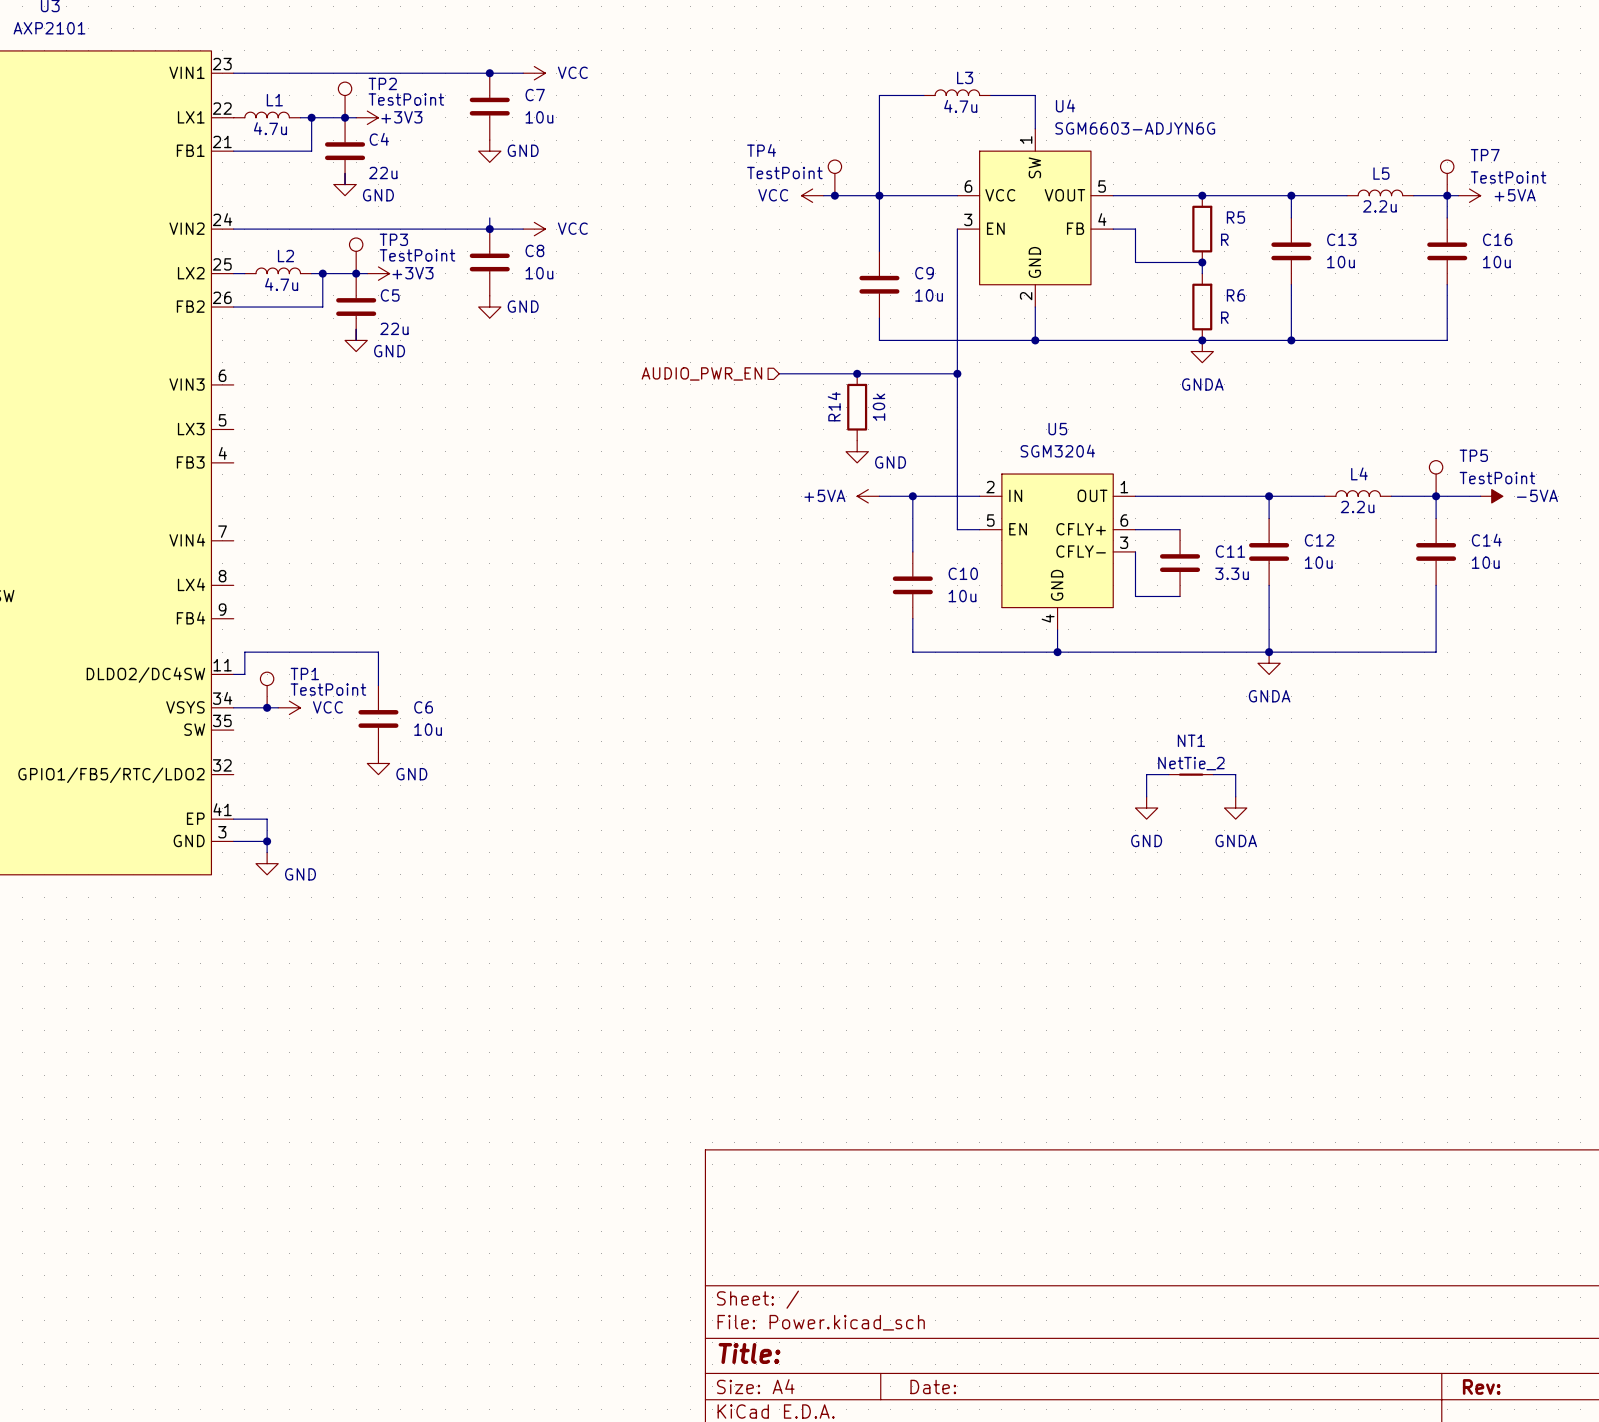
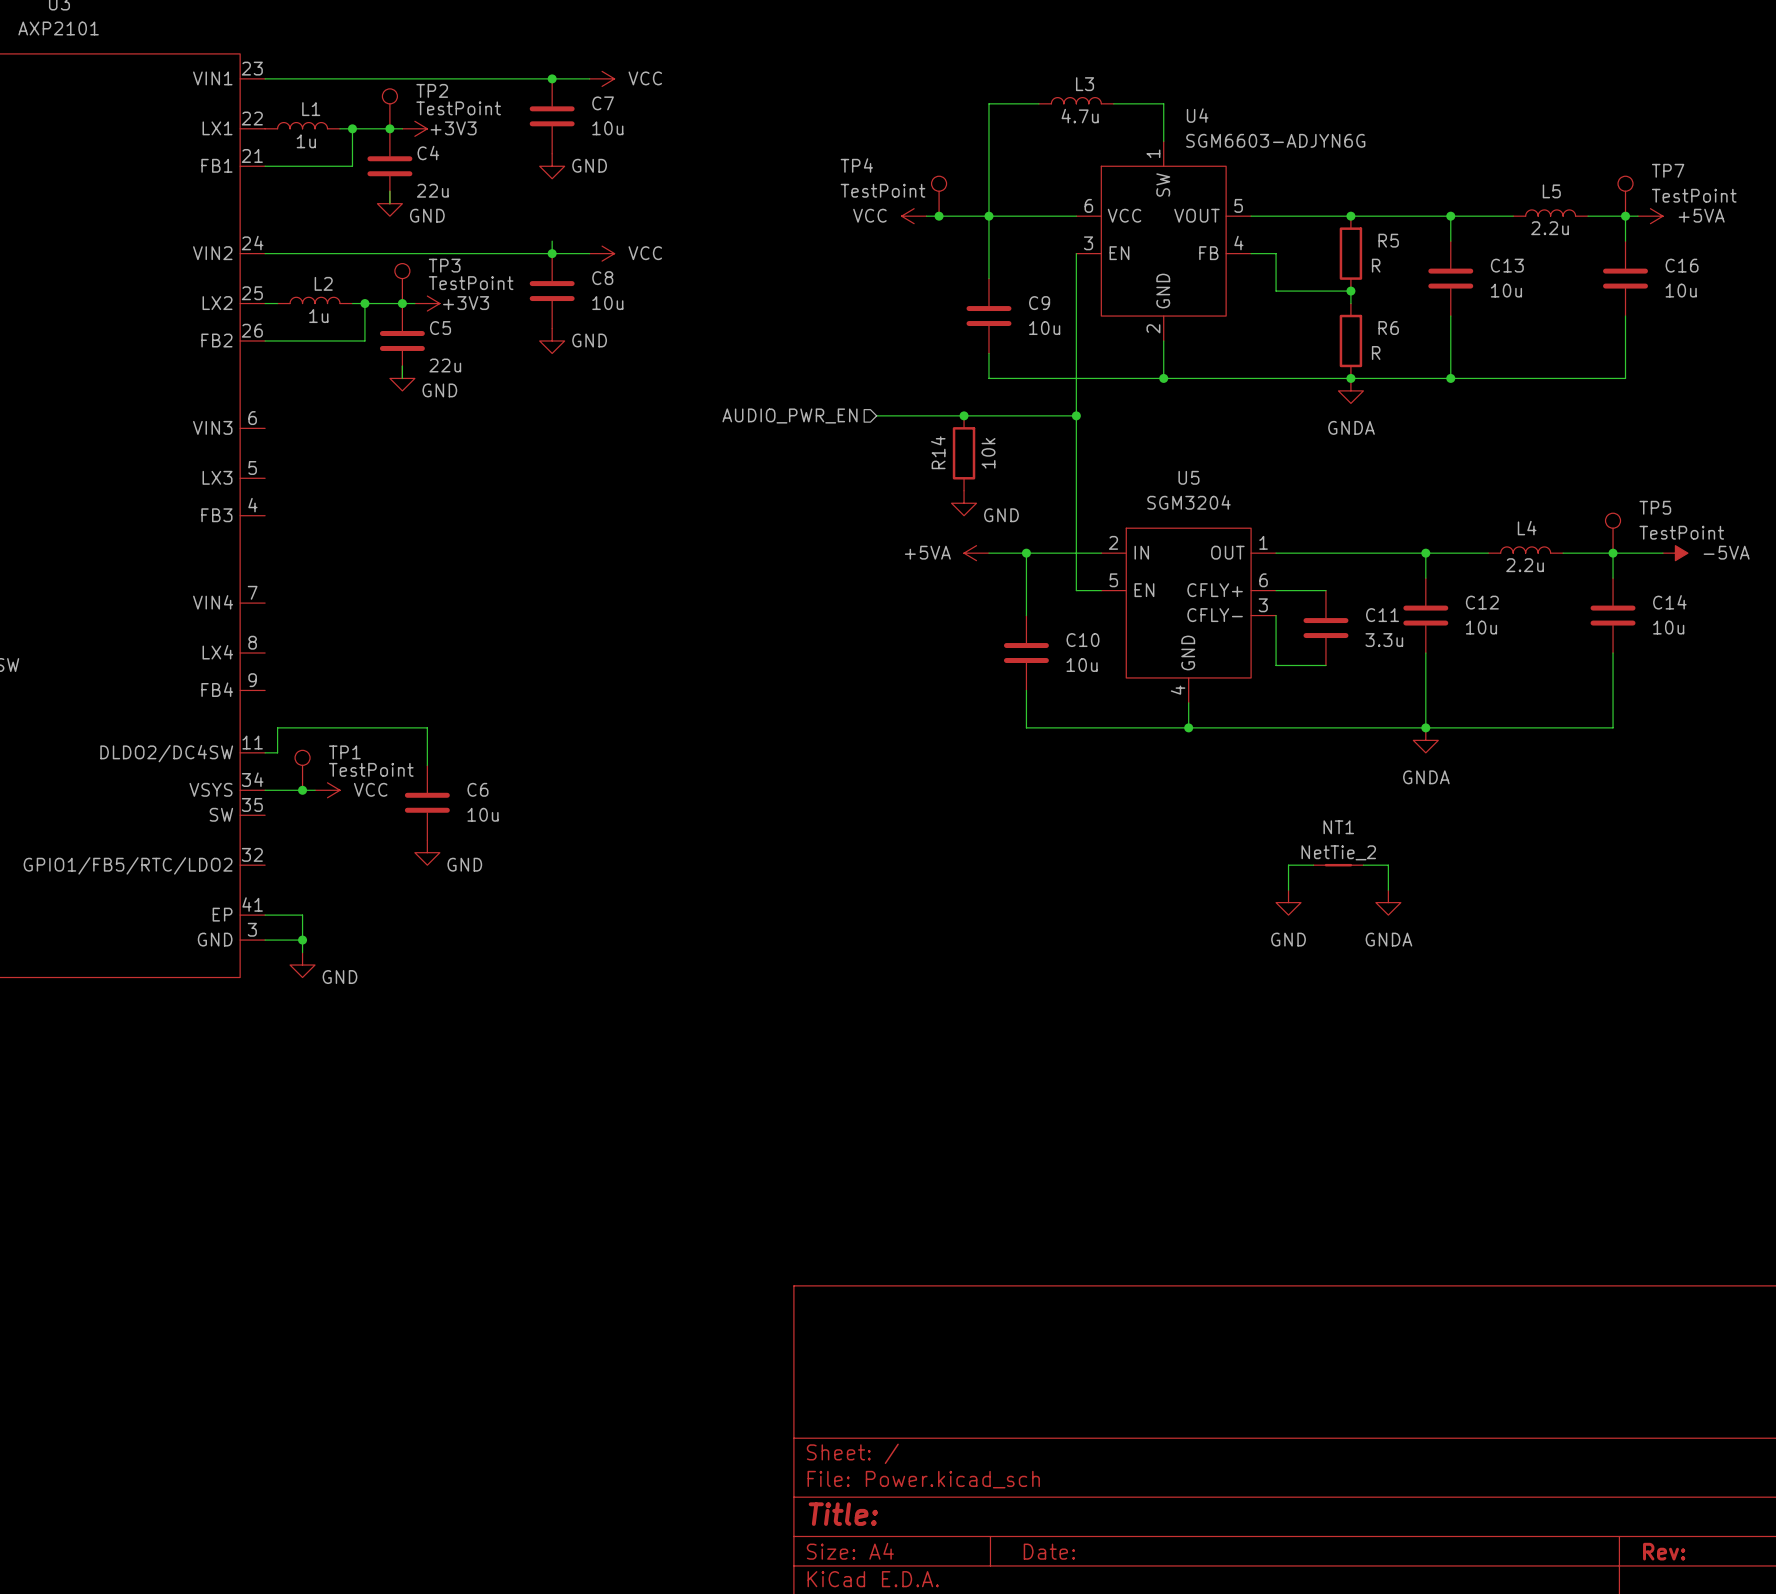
L1 value: 4.7u (270, 128) -> 1u (306, 141)
L2 value: 4.7u (281, 284) -> 1u (318, 316)

